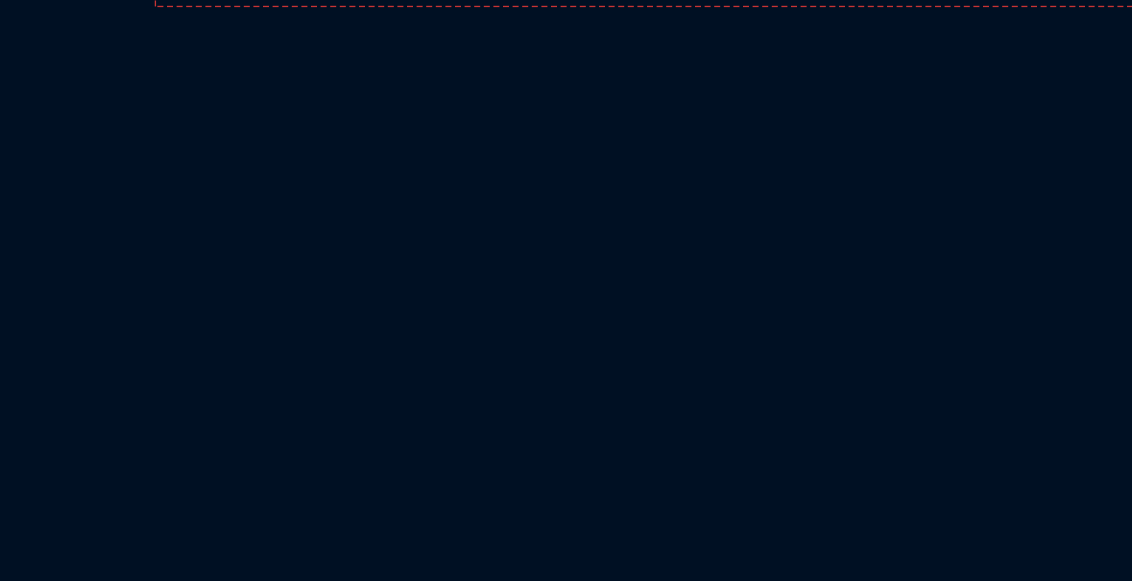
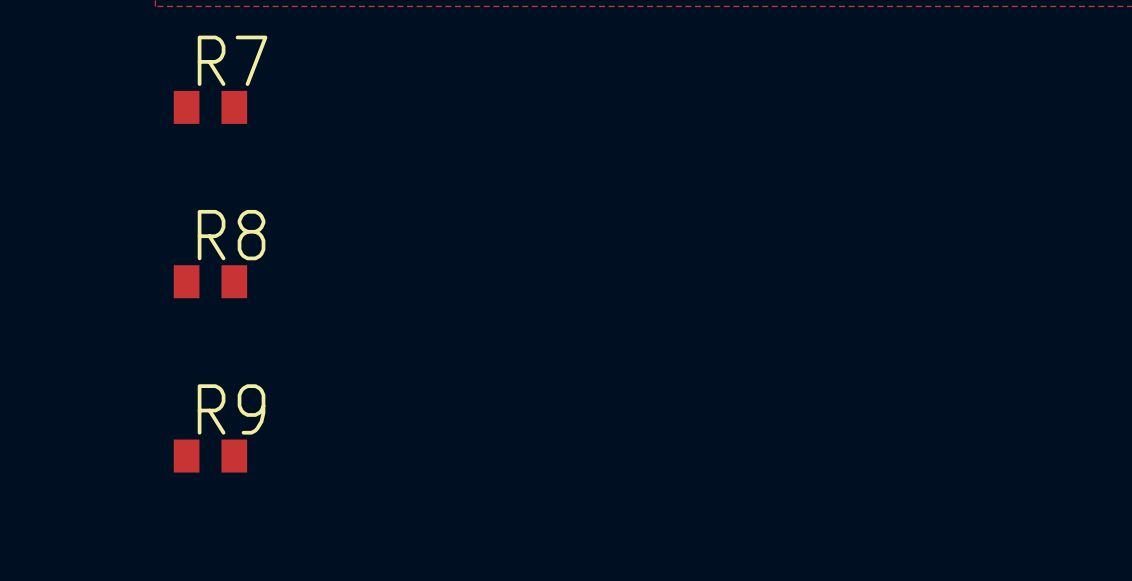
R7: none -> (210, 107)
R8: none -> (210, 281)
R9: none -> (210, 456)

